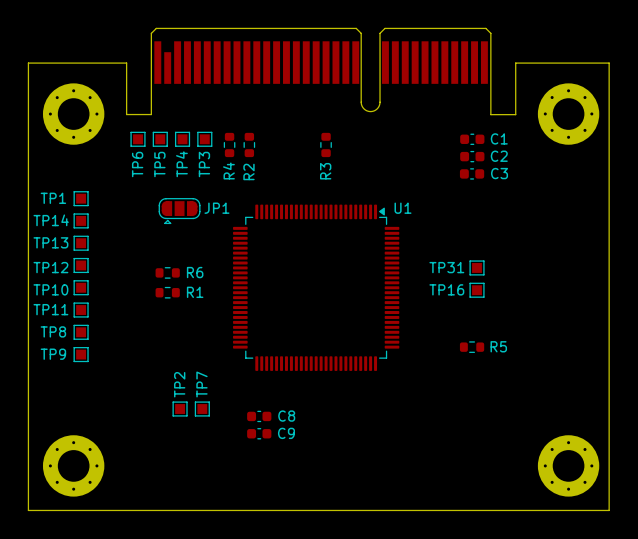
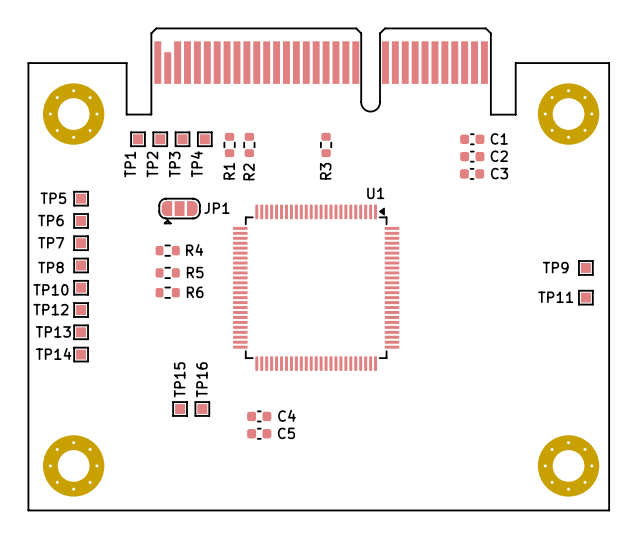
TP6 name: TP6 (137, 164) -> TP1 (130, 164)
TP5 name: TP5 (159, 164) -> TP2 (152, 164)
TP4 name: TP4 (181, 164) -> TP3 (174, 164)
TP3 name: TP3 (204, 164) -> TP4 (196, 164)
R4 name: R4 (228, 170) -> R1 (229, 171)
TP1 name: TP1 (53, 198) -> TP5 (53, 198)
U1 name position: U1 (403, 208) -> U1 (375, 193)
TP14 name: TP14 (51, 220) -> TP6 (50, 220)
TP13 name: TP13 (50, 242) -> TP7 (51, 242)
R4: none -> (167, 250)
TP12 name: TP12 (50, 267) -> TP8 (50, 267)
TP31: (477, 267) -> none
TP9: none -> (585, 267)
R6 name: R6 (195, 272) -> R5 (195, 272)
TP16: (477, 290) -> none
R1 name: R1 (195, 292) -> R6 (195, 292)
TP11: none -> (585, 297)
TP11 name: TP11 (50, 309) -> TP12 (50, 309)
TP8 name: TP8 (53, 331) -> TP13 (53, 331)
R5: (472, 347) -> none
TP9 name: TP9 (53, 354) -> TP14 (53, 353)
TP2 name: TP2 (179, 384) -> TP15 (179, 379)
TP7 name: TP7 (201, 384) -> TP16 (201, 379)
C8 name: C8 (286, 416) -> C4 (286, 415)
C9 name: C9 (286, 433) -> C5 (286, 433)

